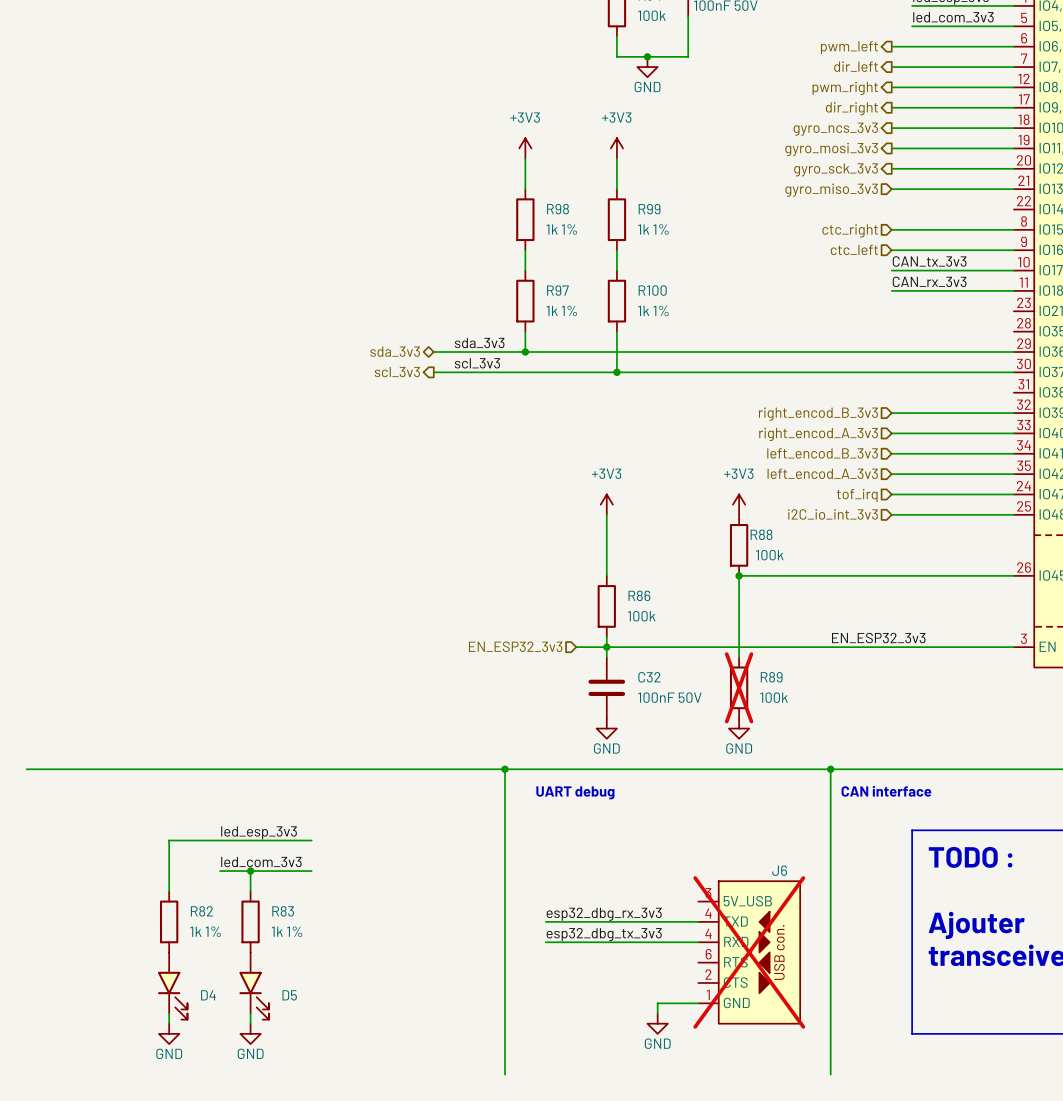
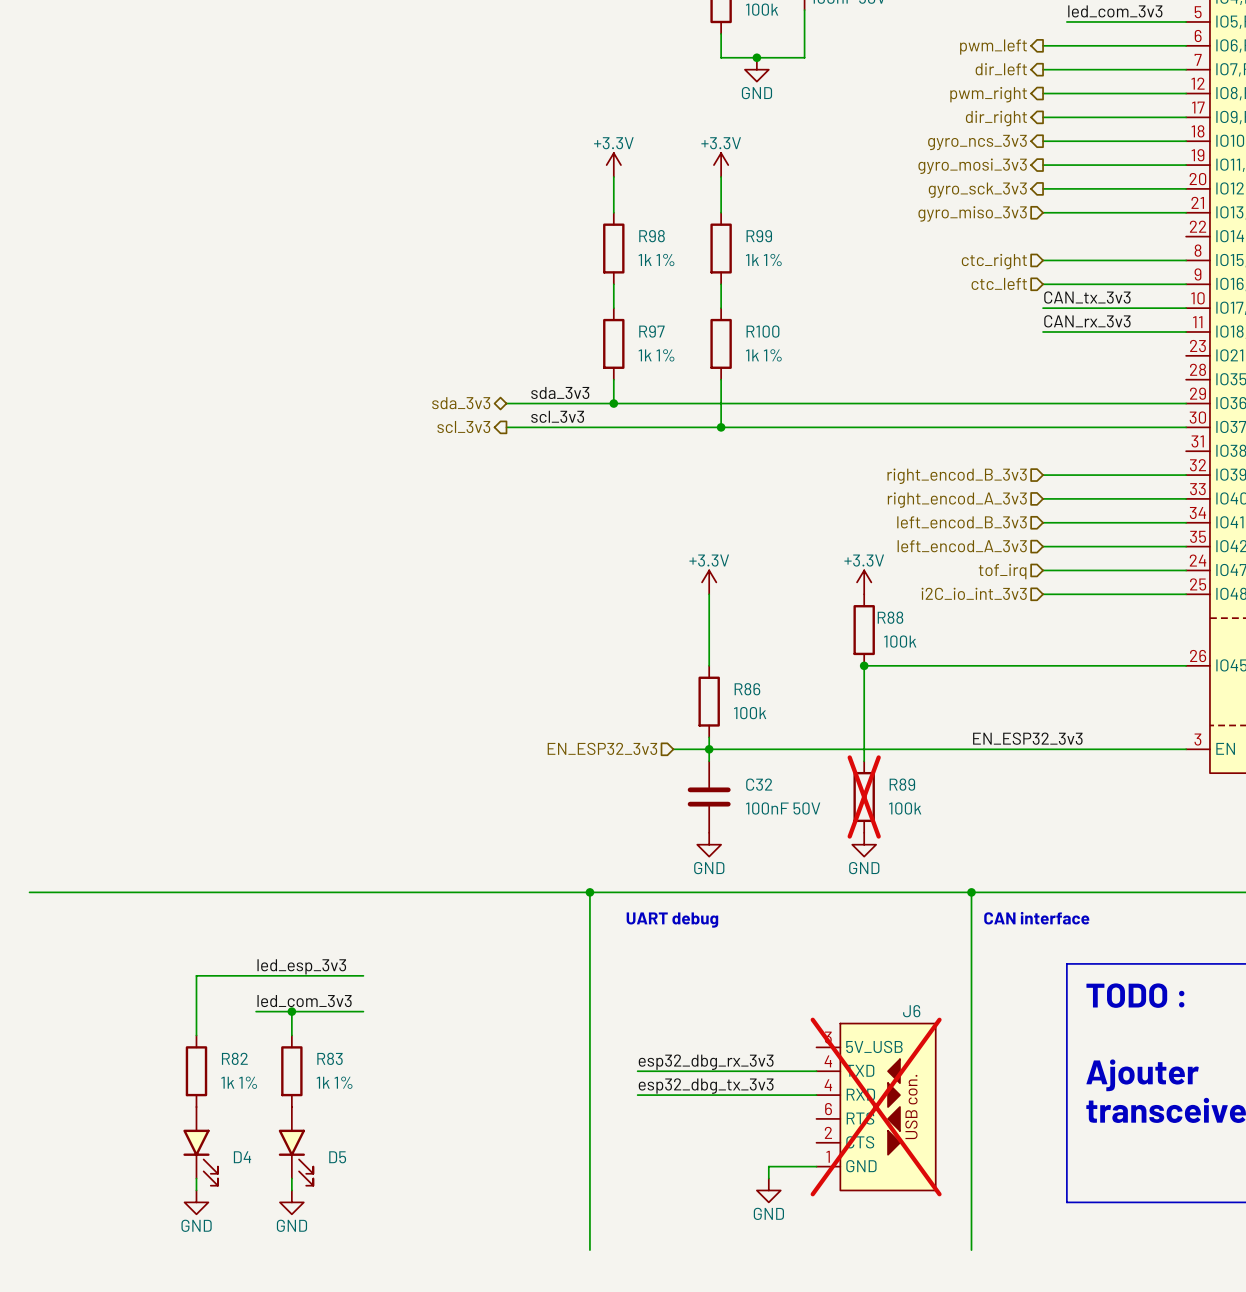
power symbol: +3V3 (525, 148) -> +3.3V (613, 165)
power symbol: +3V3 (616, 148) -> +3.3V (721, 165)
power symbol: +3V3 (606, 504) -> +3.3V (709, 582)
power symbol: +3V3 (739, 504) -> +3.3V (864, 582)

